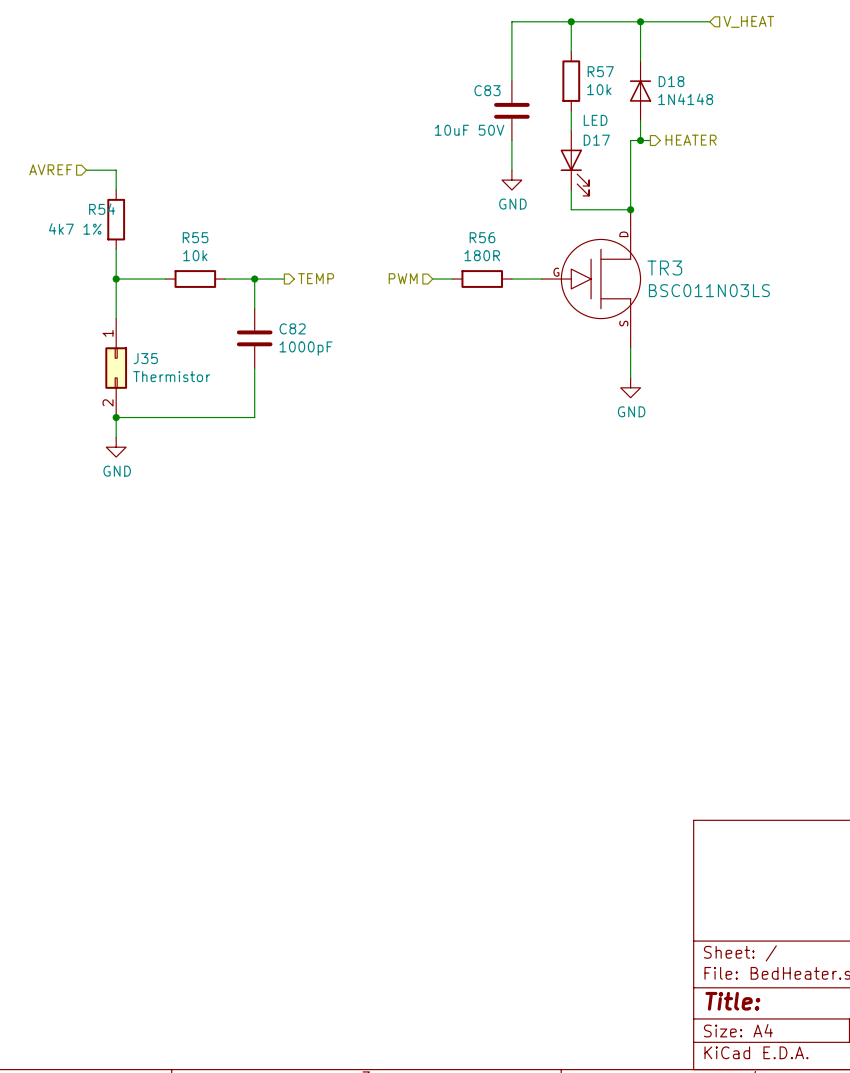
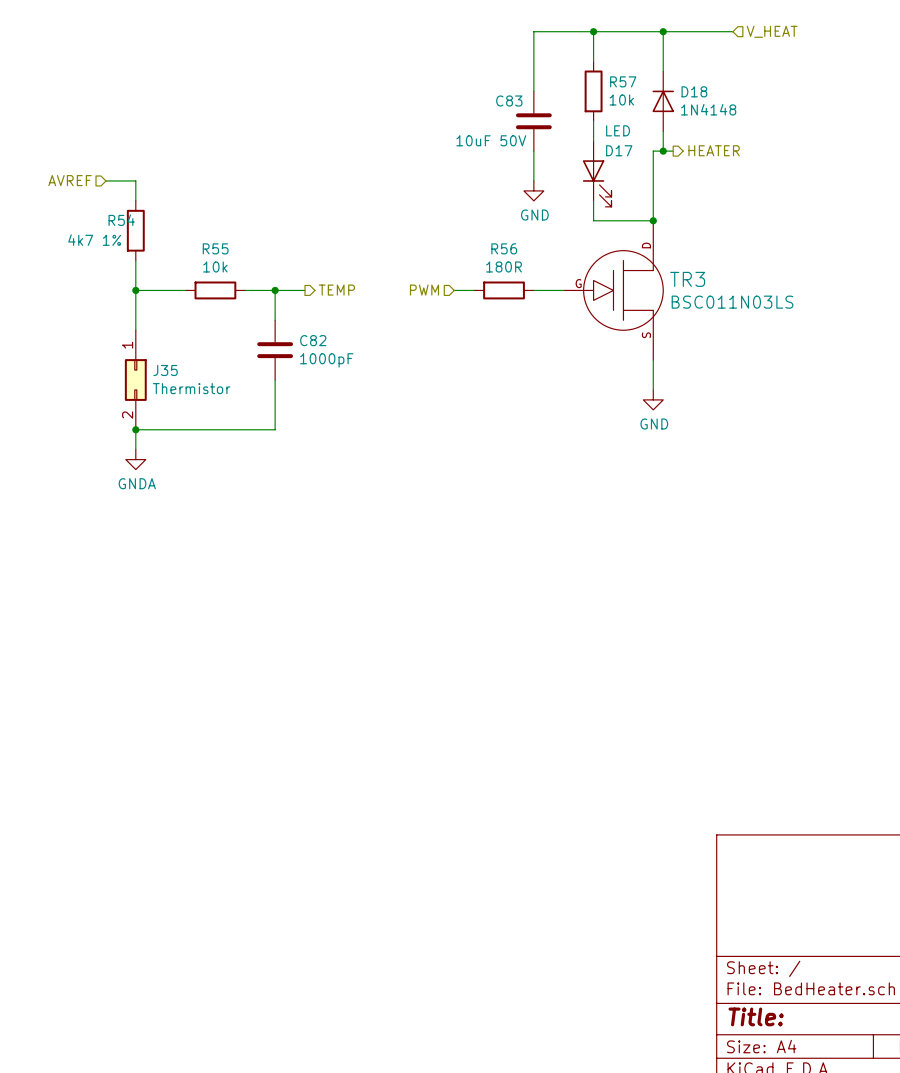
power symbol: GND (116, 447) -> GNDA (135, 459)

